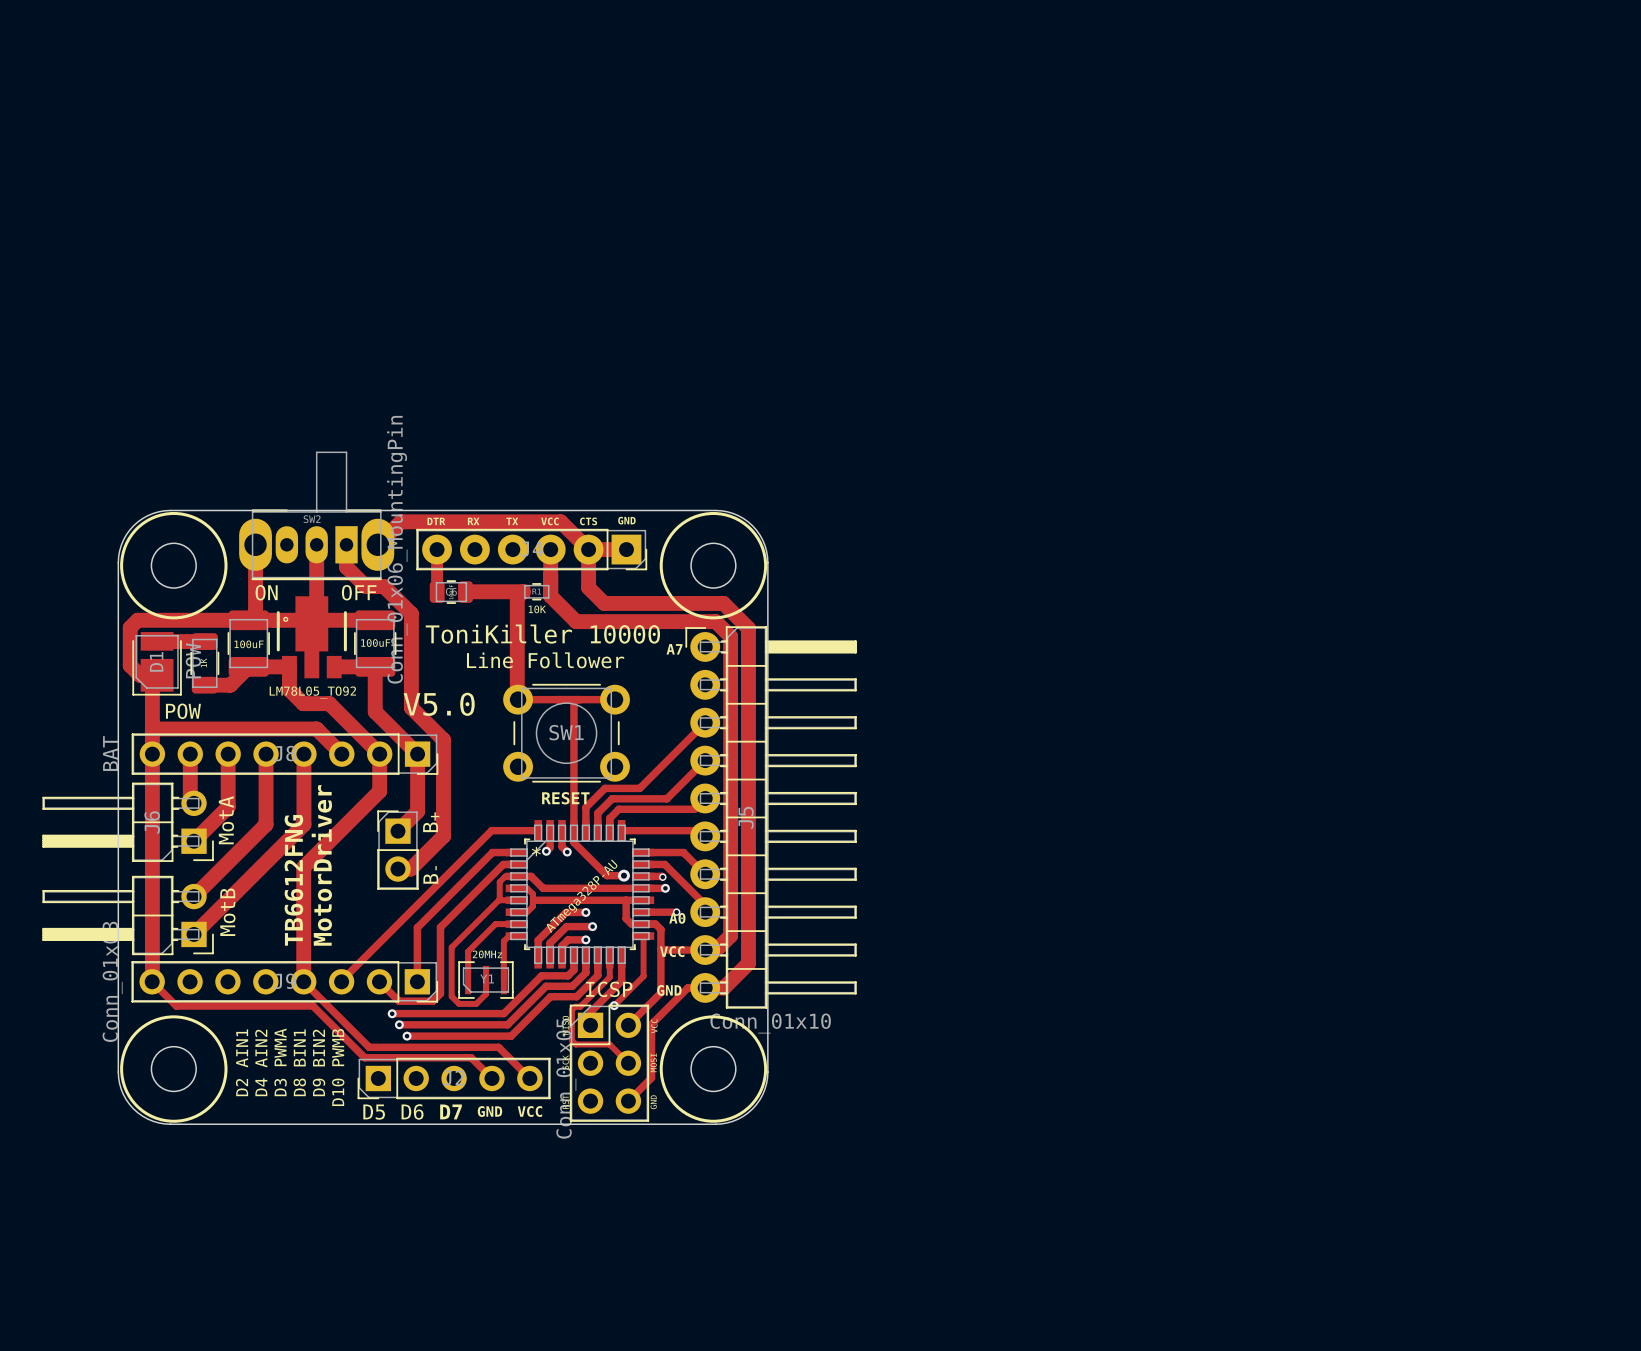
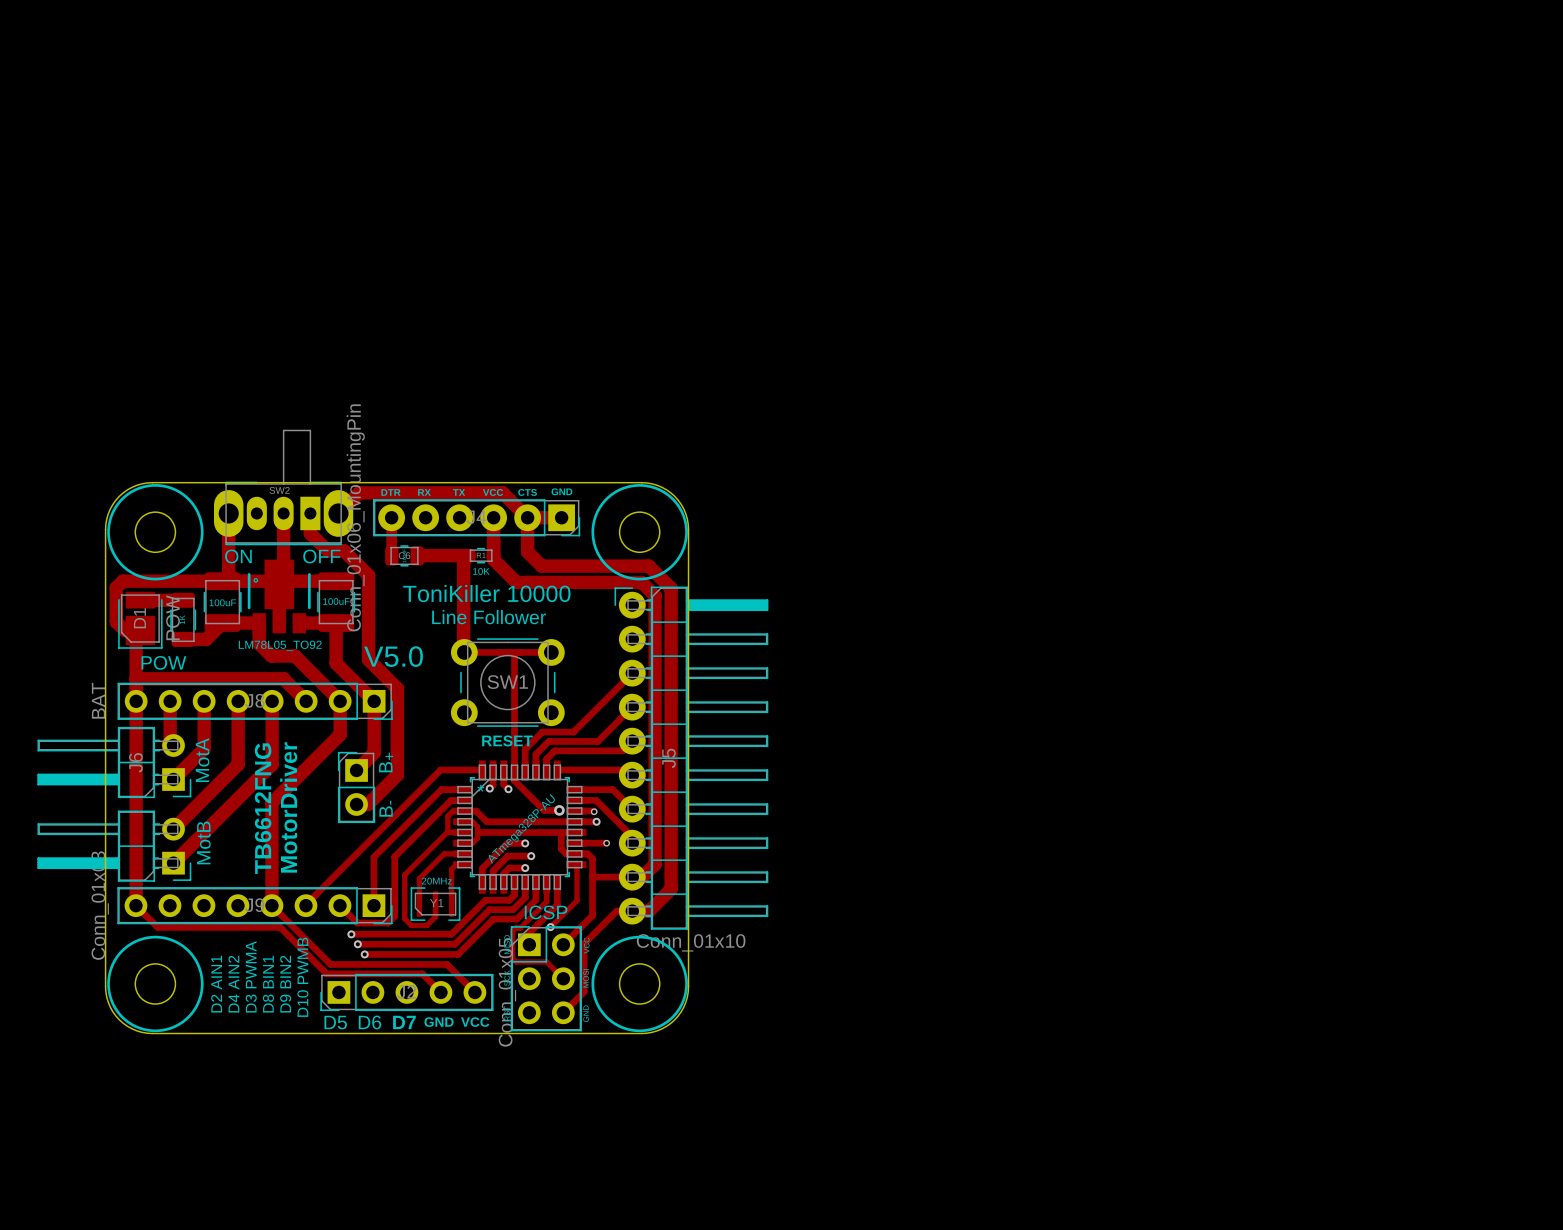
text: A7 (674, 649) -> none
text: A0 (677, 918) -> none
text: VCC (672, 951) -> none
text: GND (669, 990) -> none

